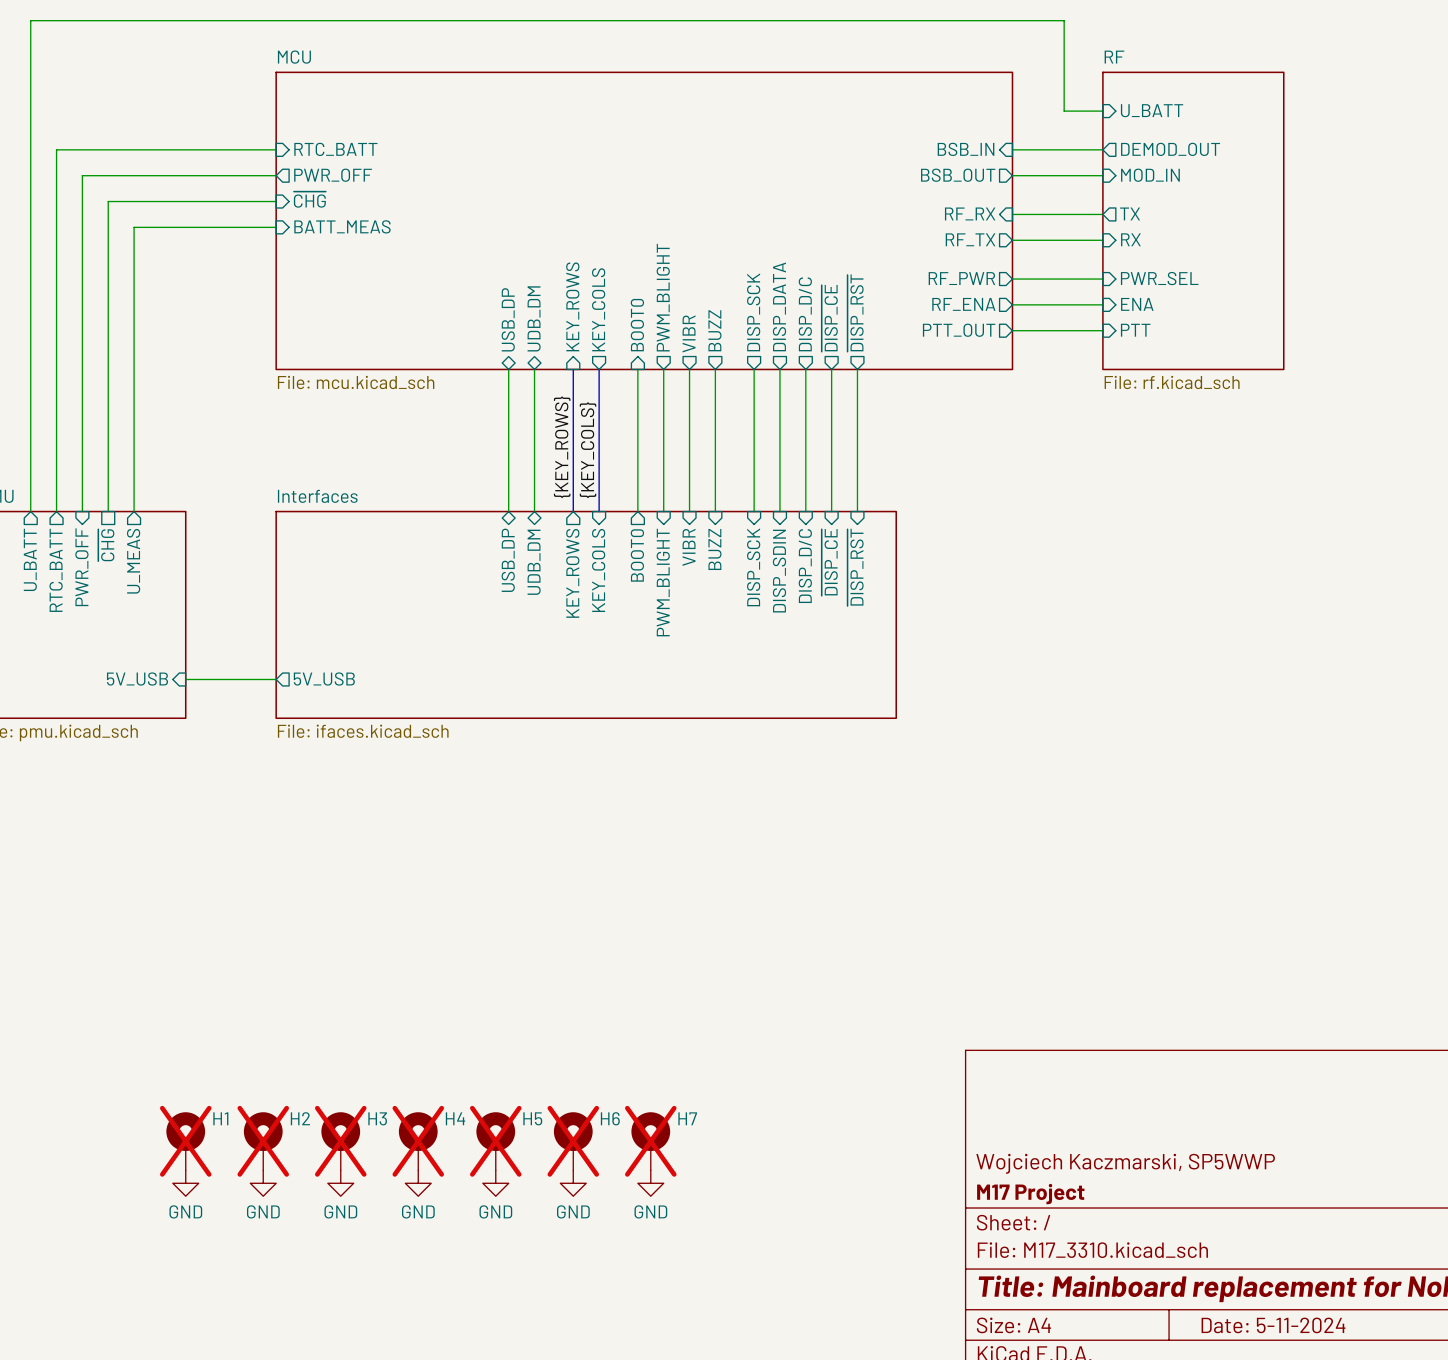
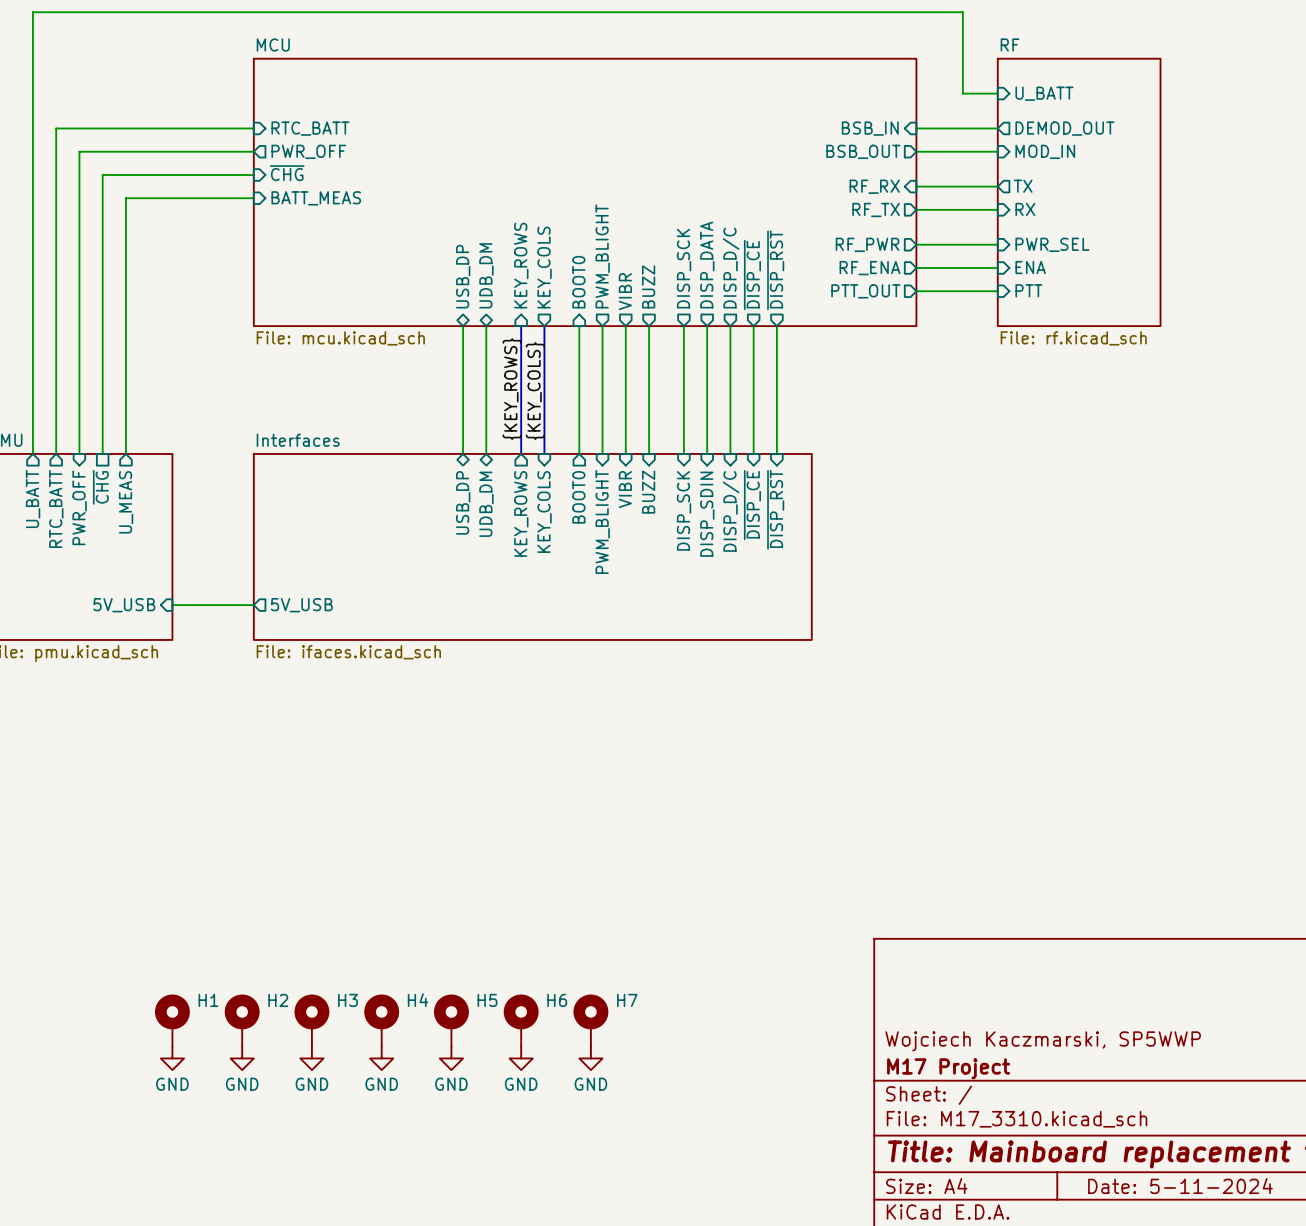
H1 do-not-place cross: (185, 1141) -> none
H2 do-not-place cross: (263, 1141) -> none
H3 do-not-place cross: (340, 1141) -> none
H4 do-not-place cross: (418, 1141) -> none
H5 do-not-place cross: (495, 1141) -> none
H6 do-not-place cross: (573, 1141) -> none
H7 do-not-place cross: (650, 1141) -> none

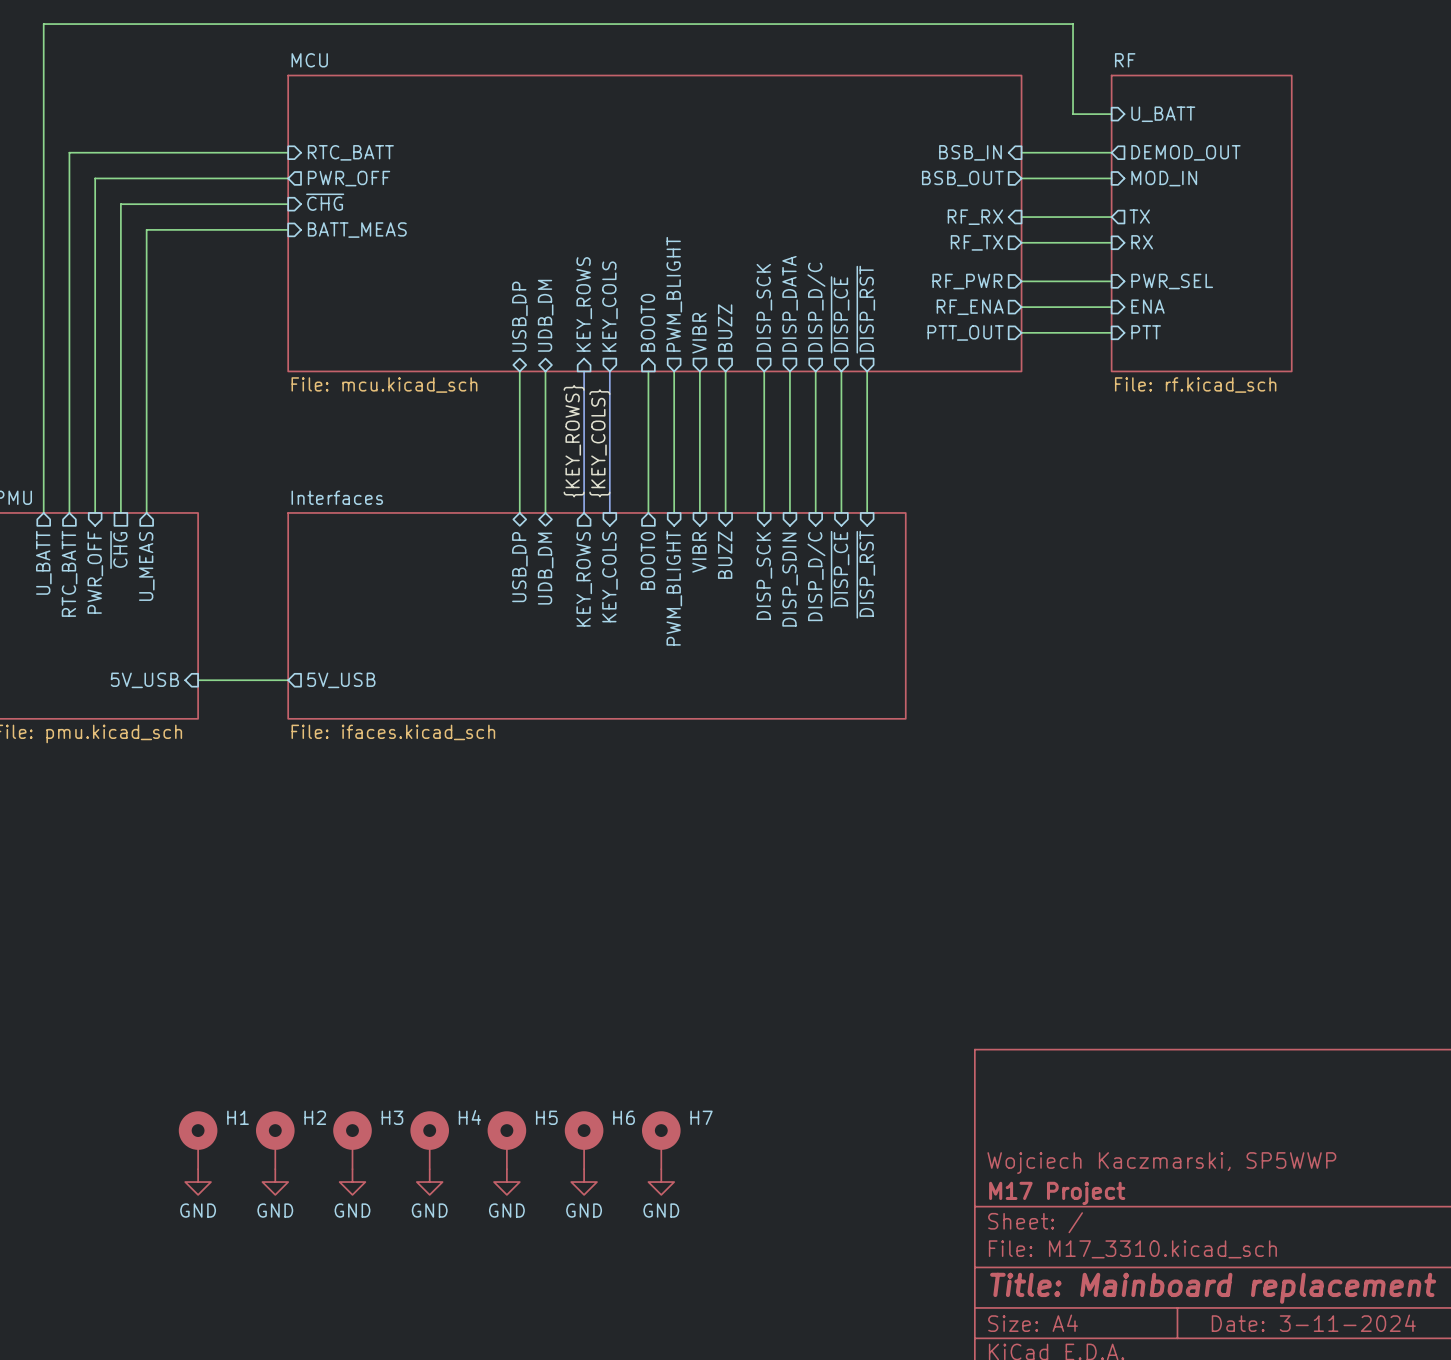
title block: Date: 5-11-2024 (1180, 1186) -> Date: 3-11-2024 (1313, 1323)

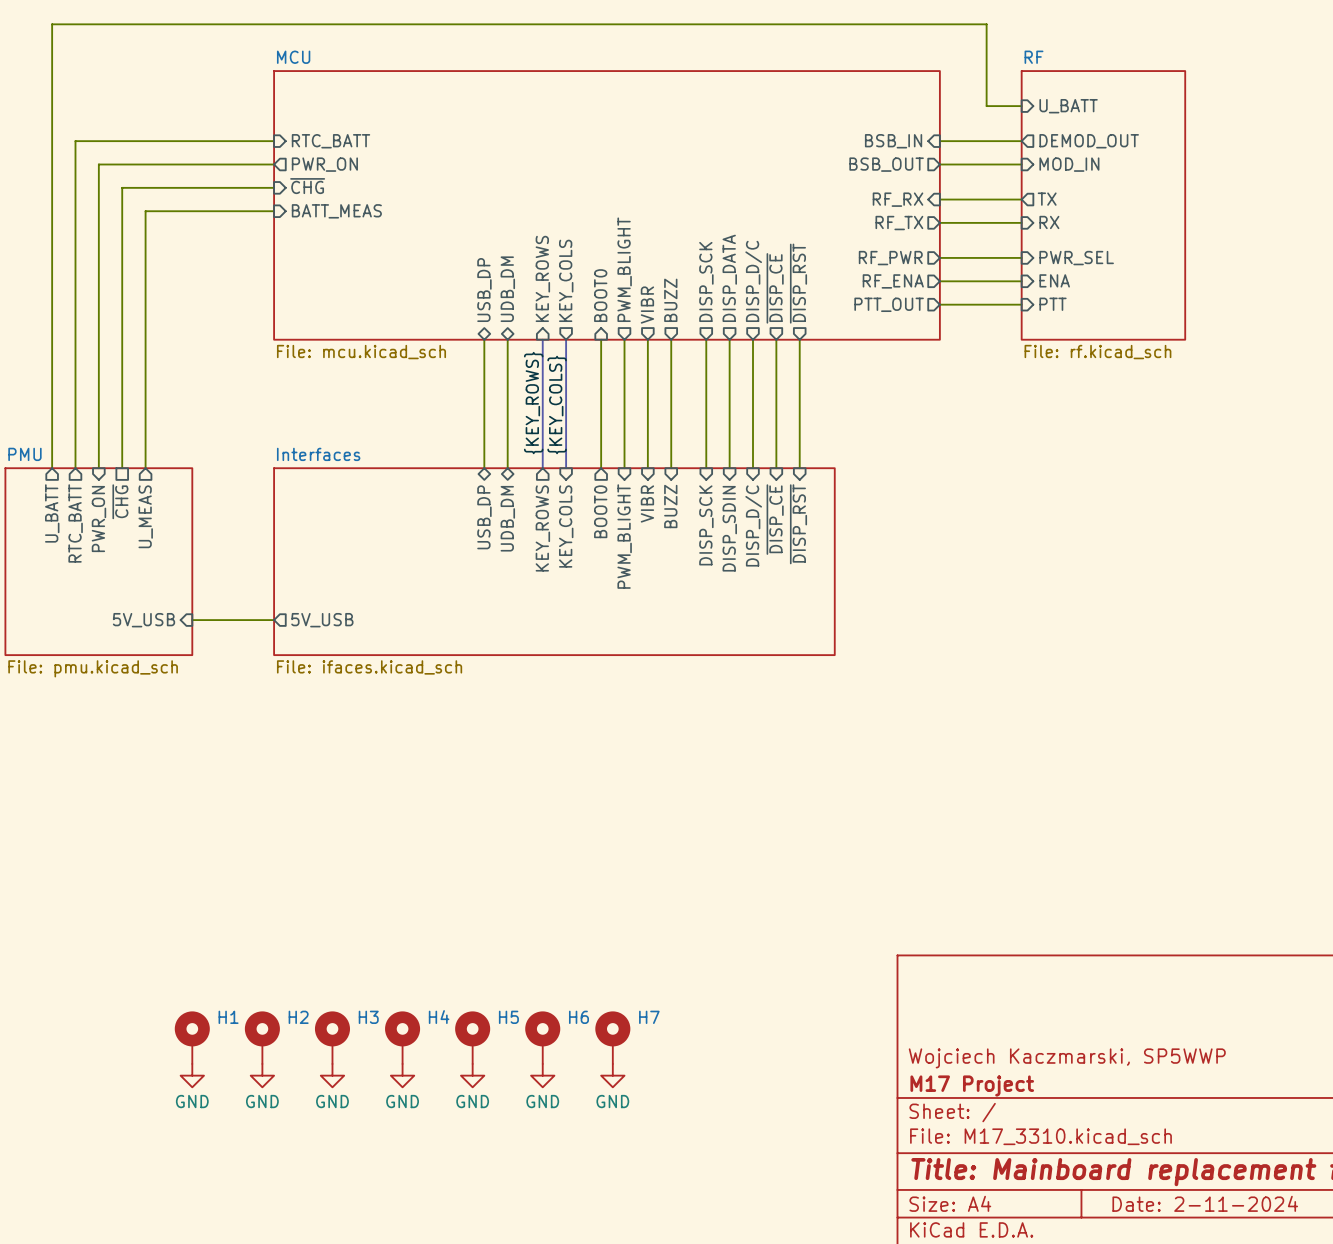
sheet pin: PWR_OFF (349, 178) -> PWR_ON (324, 164)
sheet pin: PWR_OFF (95, 572) -> PWR_ON (98, 519)
title block: Date: 3-11-2024 (1313, 1323) -> Date: 2-11-2024 (1205, 1203)

